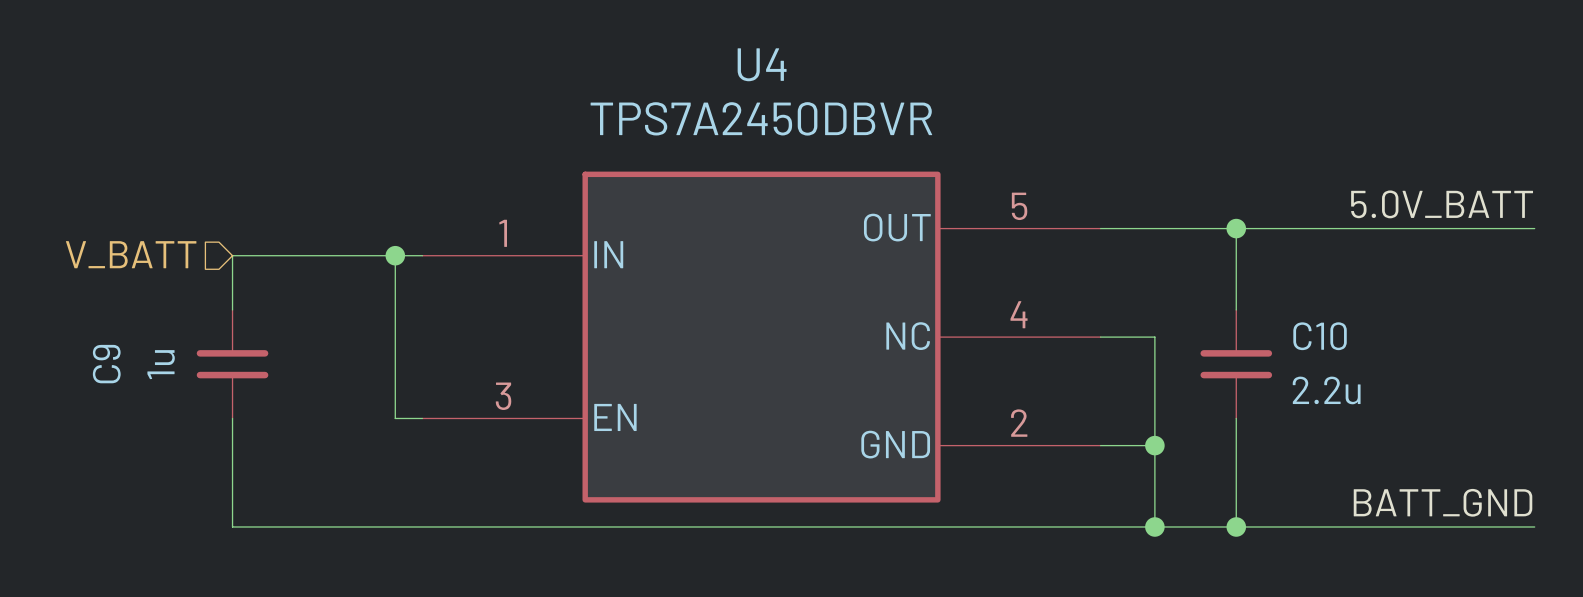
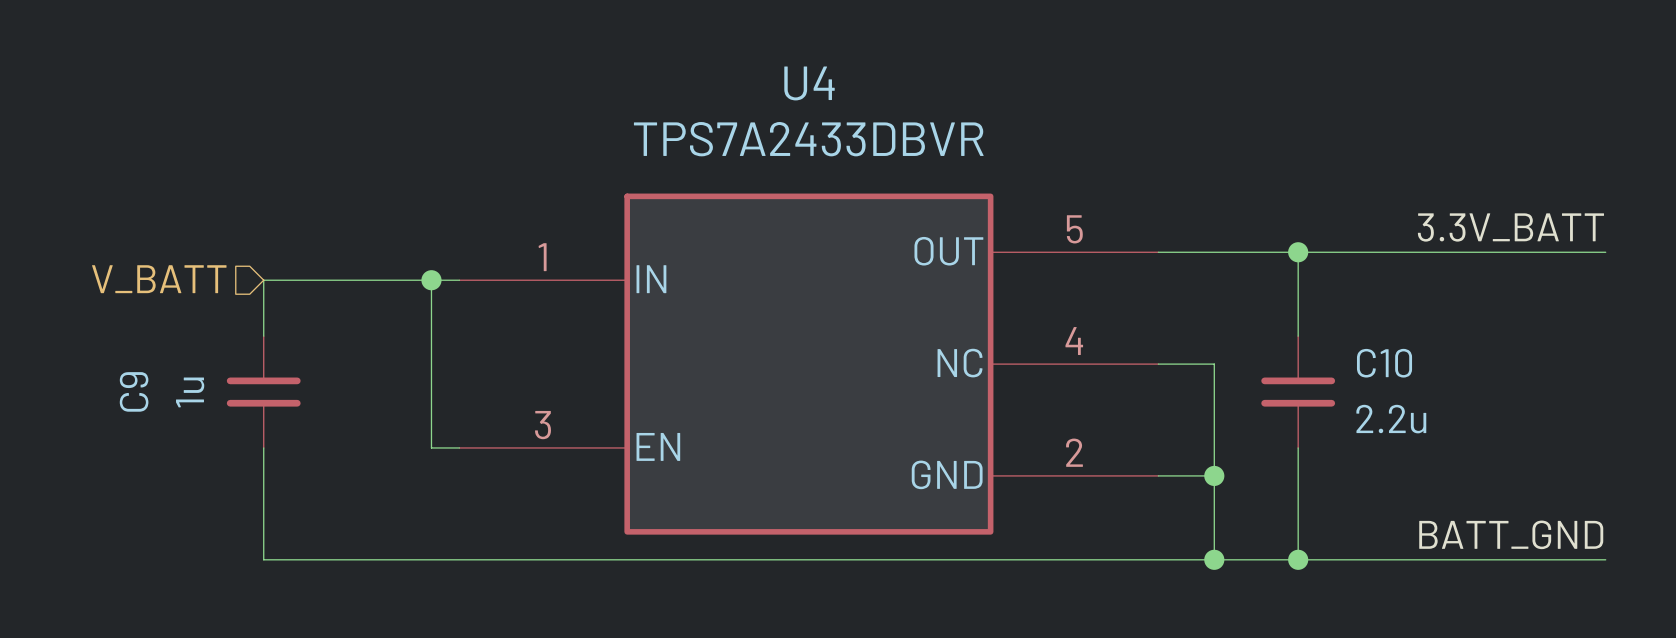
U4 value: TPS7A2450DBVR (761, 118) -> TPS7A2433DBVR (808, 139)
label: 5.0V_BATT (1442, 204) -> 3.3V_BATT (1510, 227)

